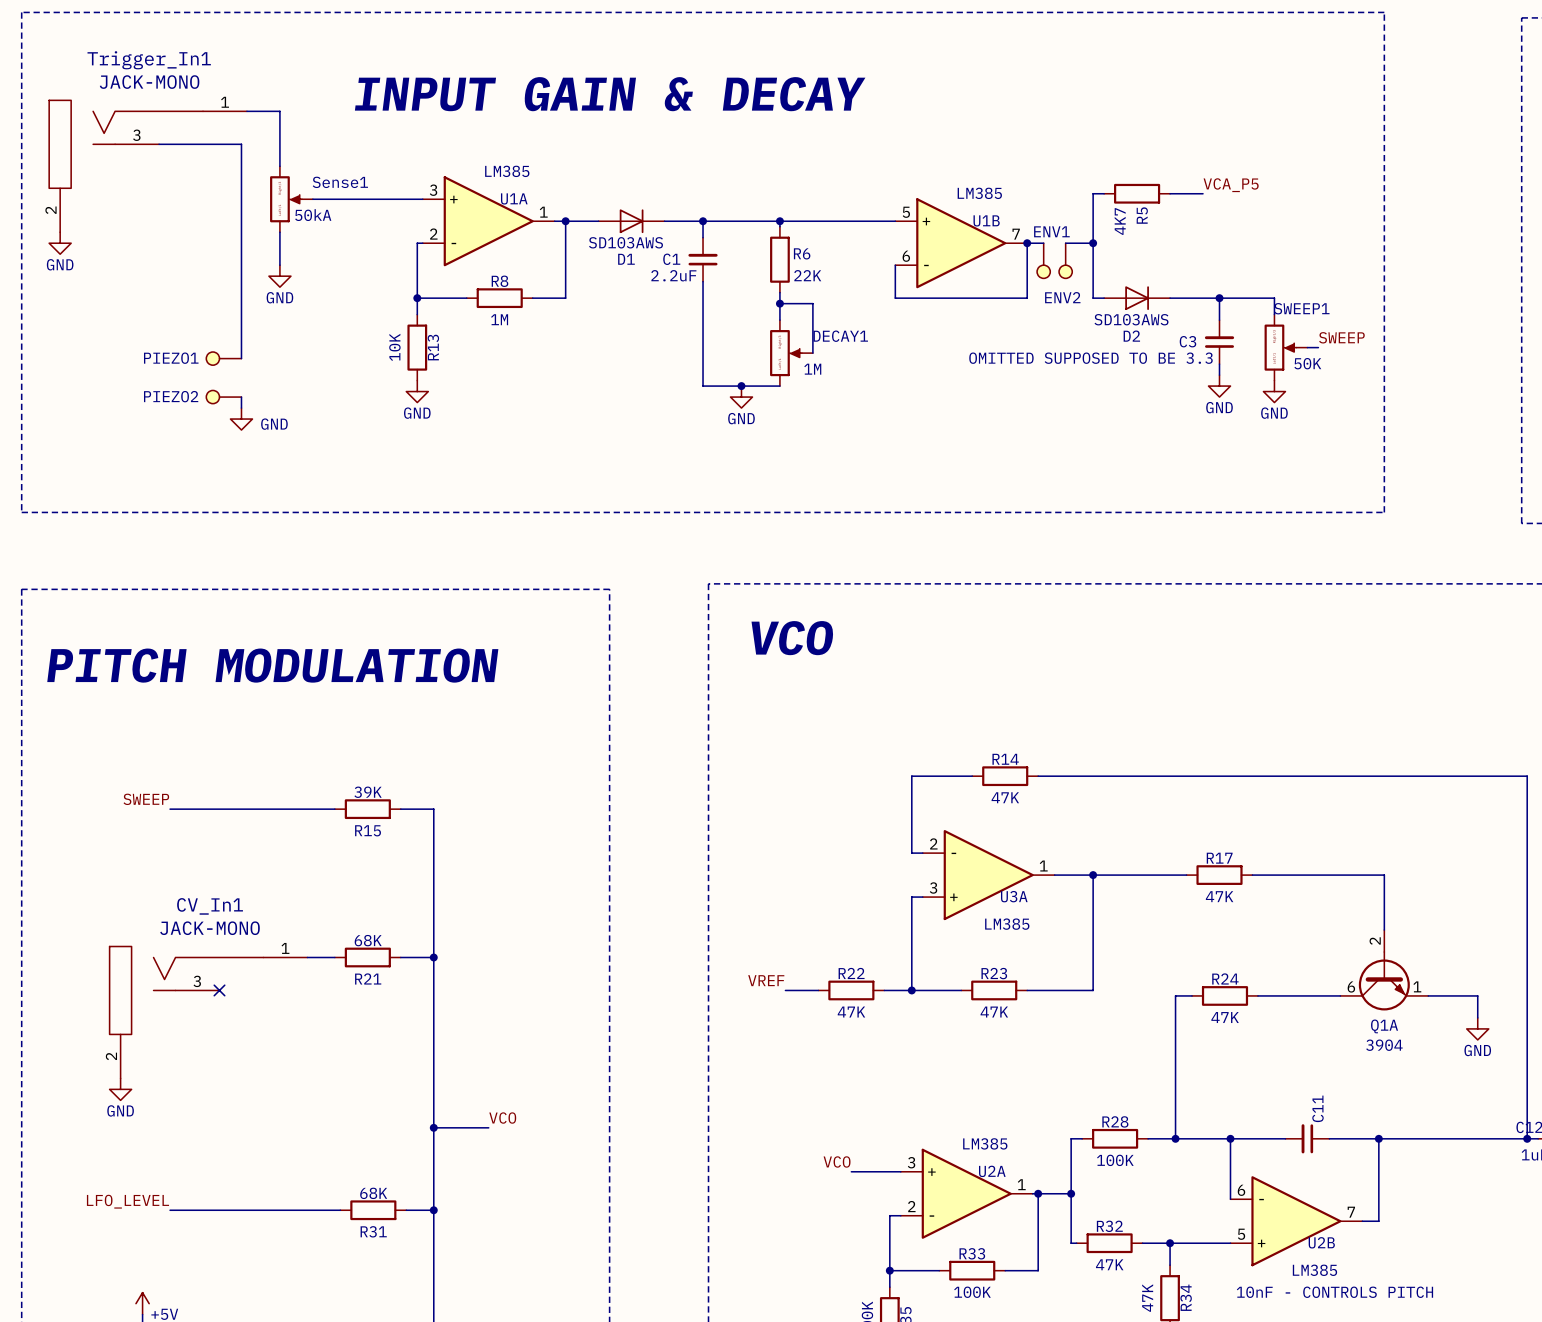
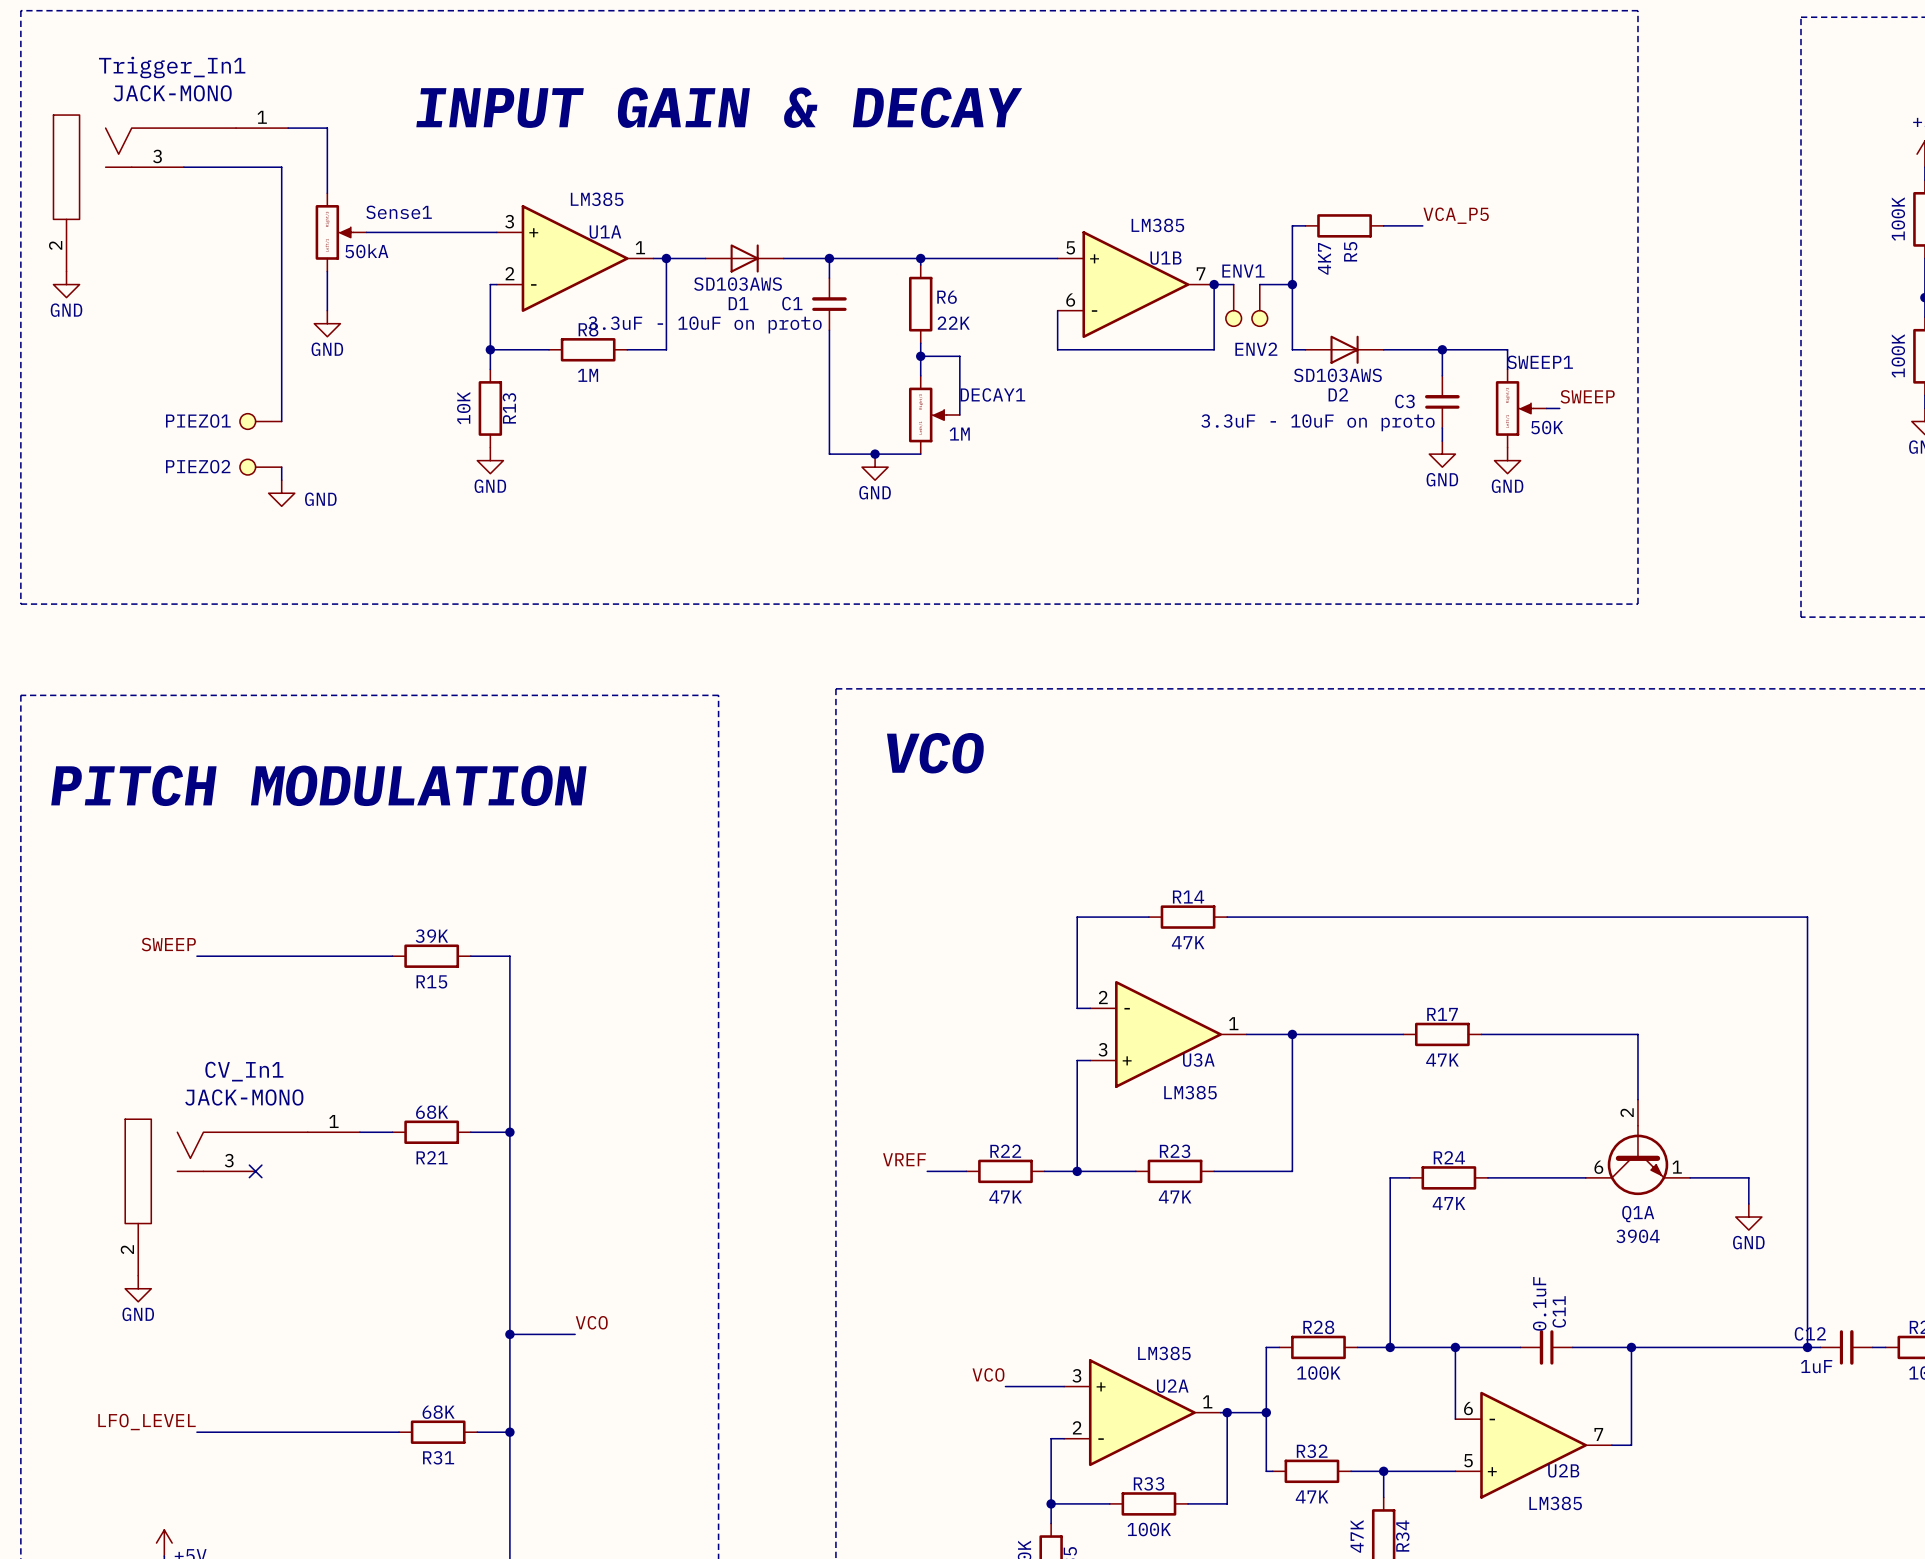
C1 value: 2.2uF (673, 275) -> 3.3uF - 10uF on proto (705, 324)
C3 value: OMITTED SUPPOSED TO BE 3.3 (1090, 358) -> 3.3uF - 10uF on proto (1317, 422)
C11 value: 10nF - CONTROLS PITCH (1334, 1292) -> 0.1uF (1539, 1303)

